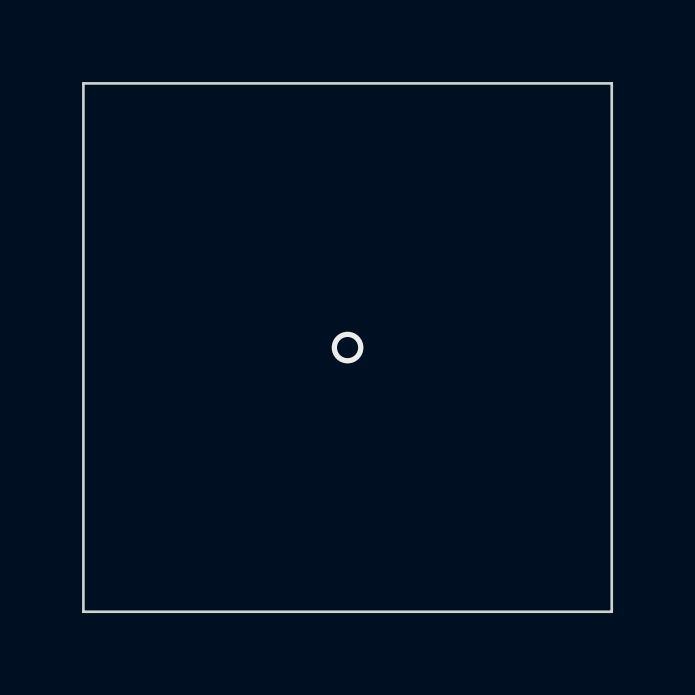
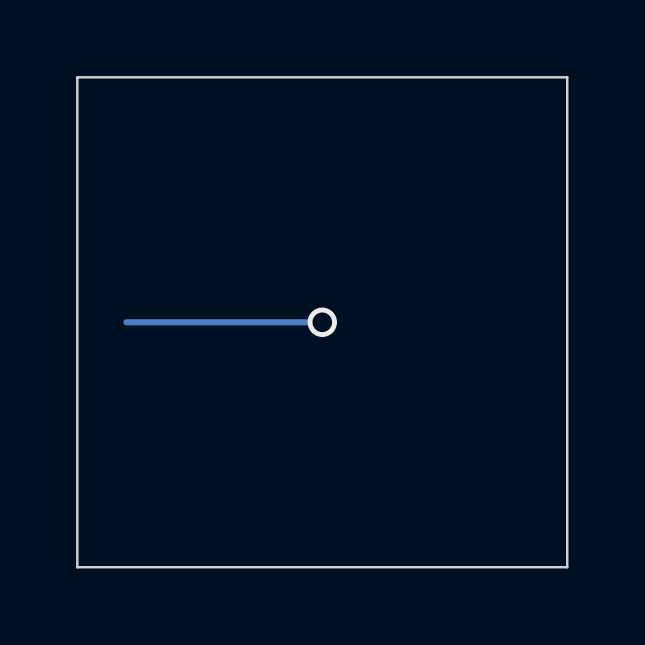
track: none -> (322, 322) (126, 322)

